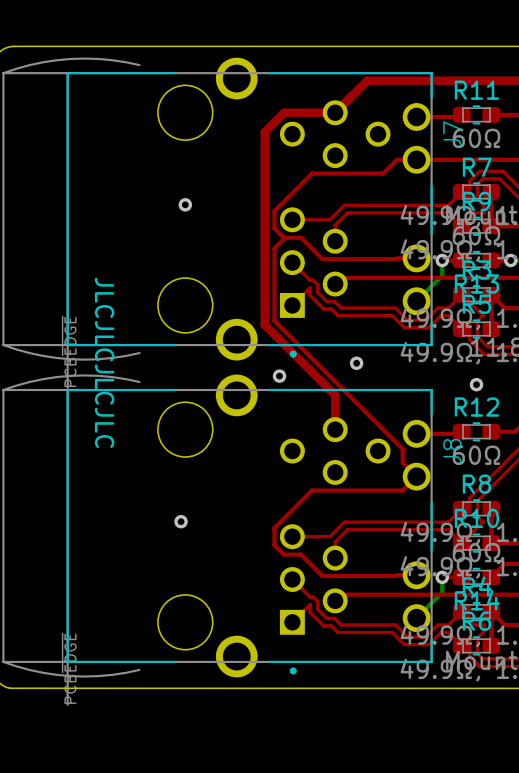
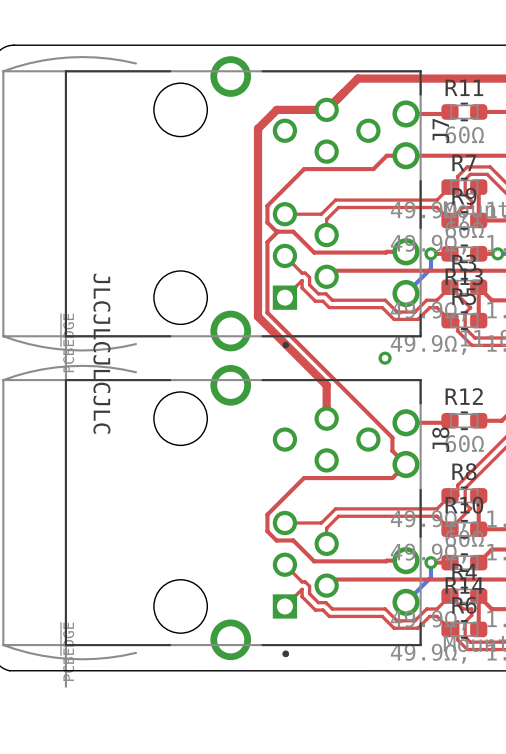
via: (185, 204) -> none
via position: (356, 363) -> (385, 358)
via: (279, 376) -> none
via: (476, 384) -> none
via: (181, 521) -> none

